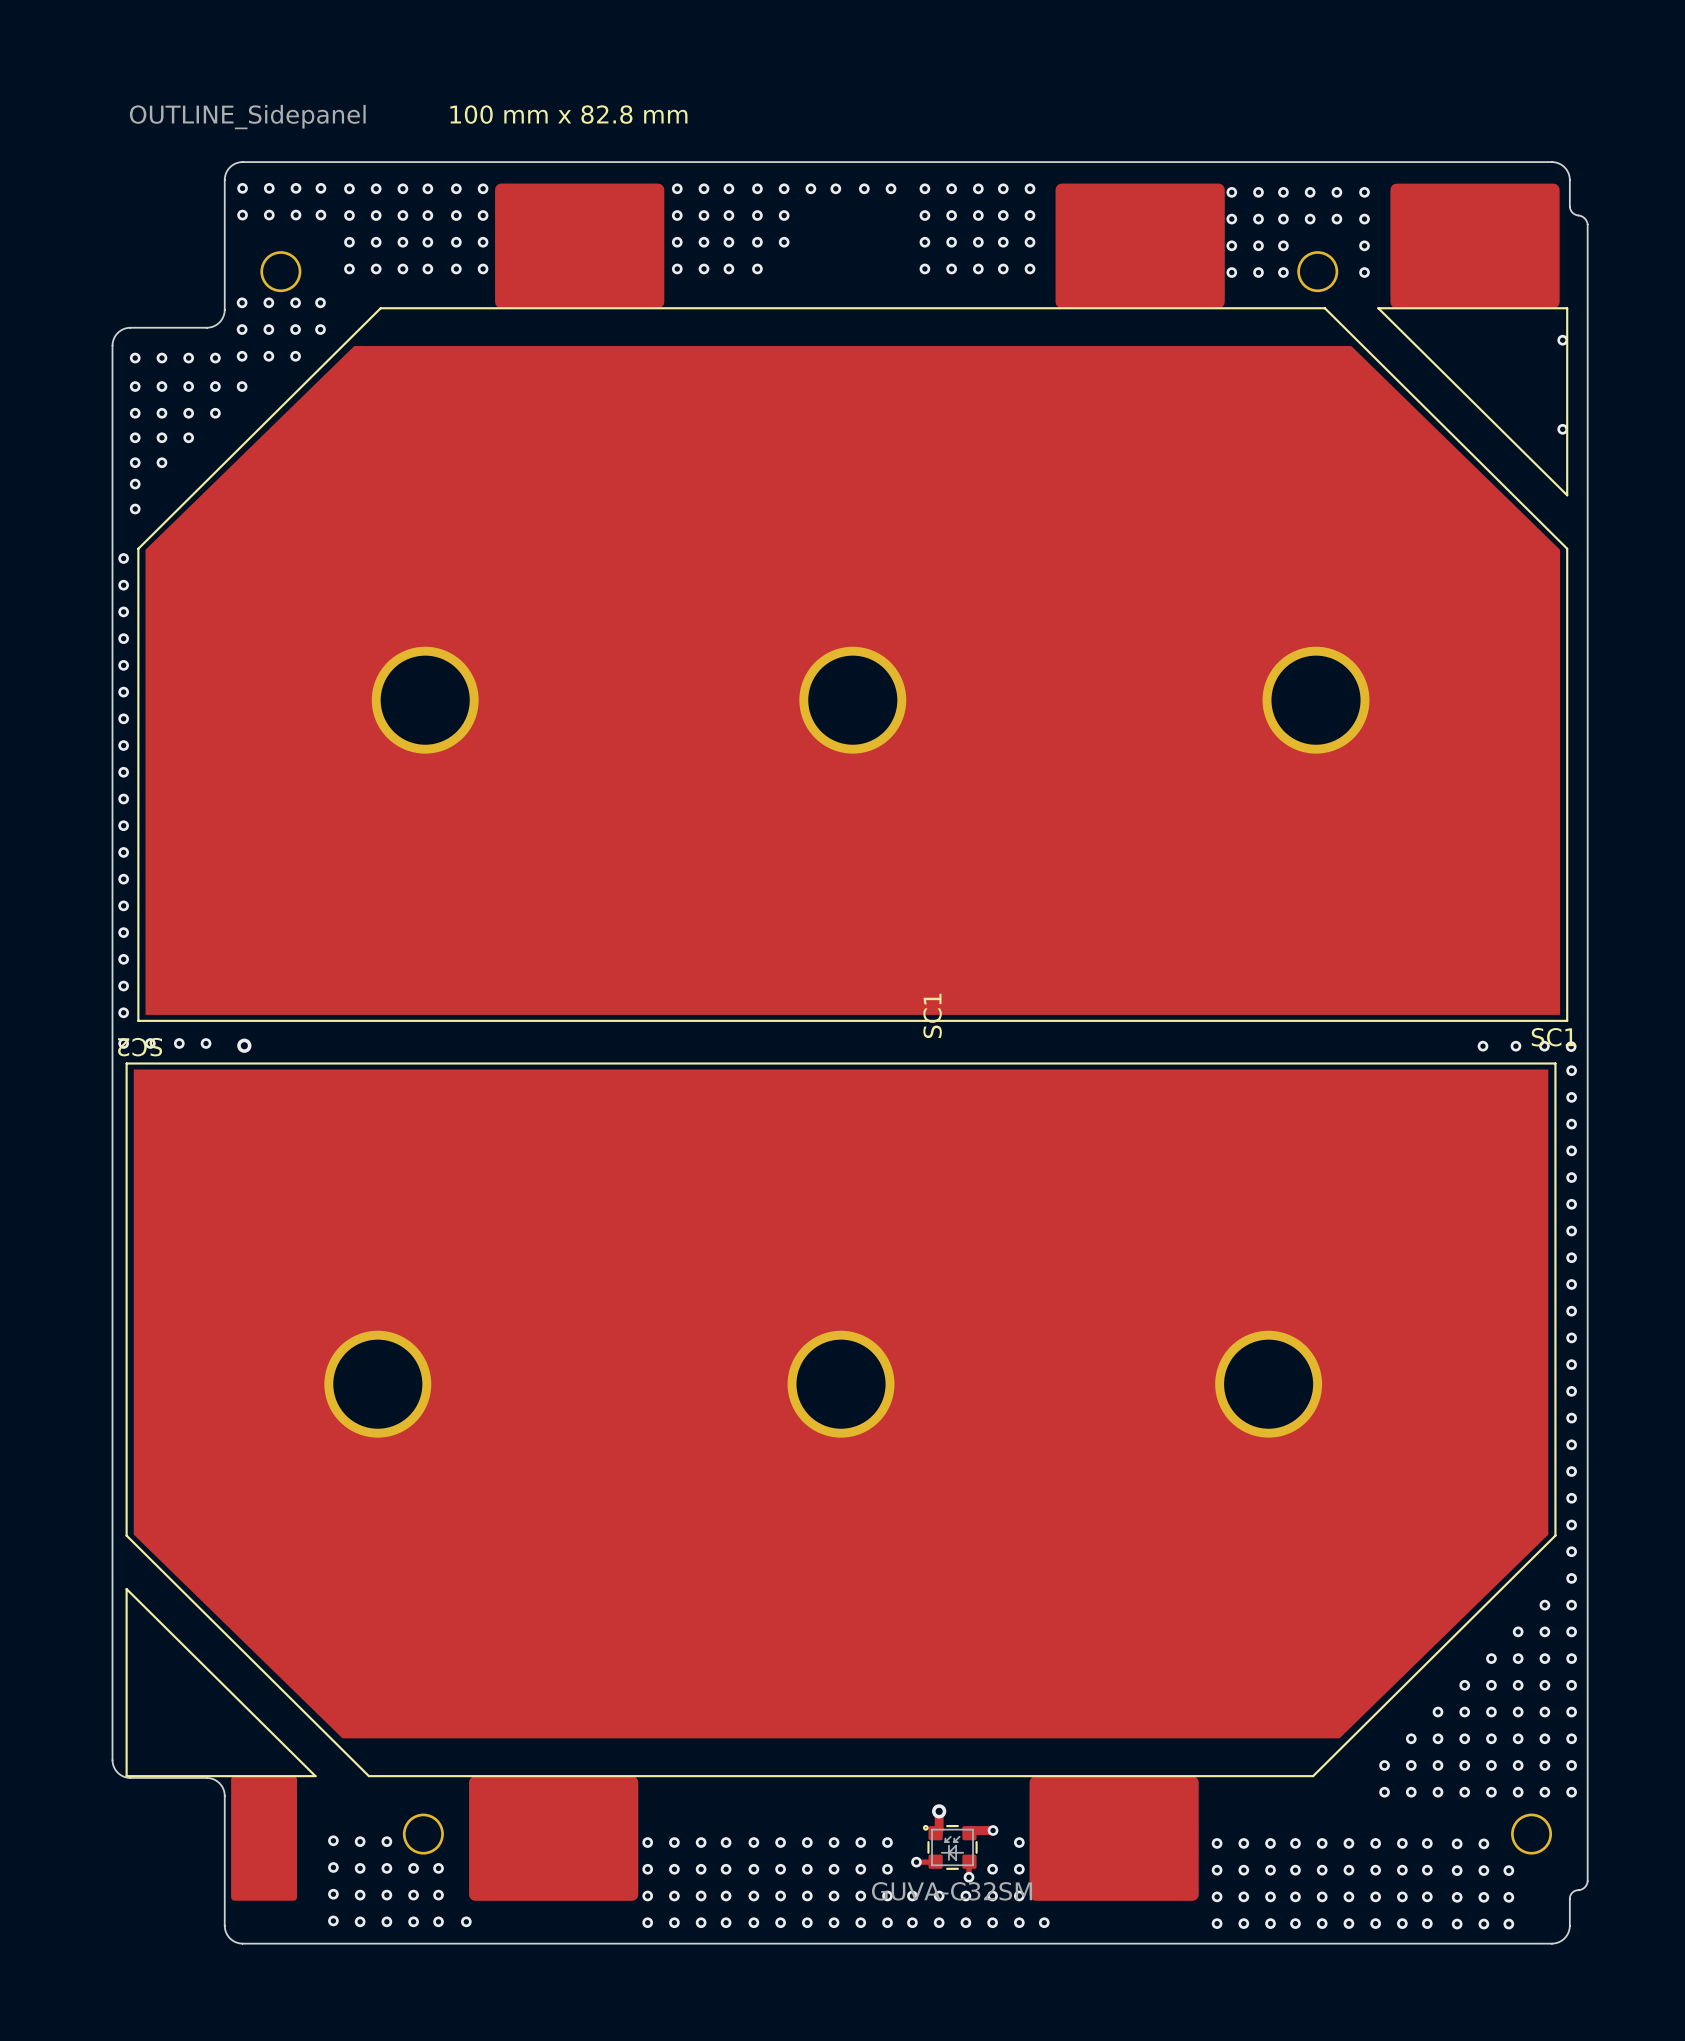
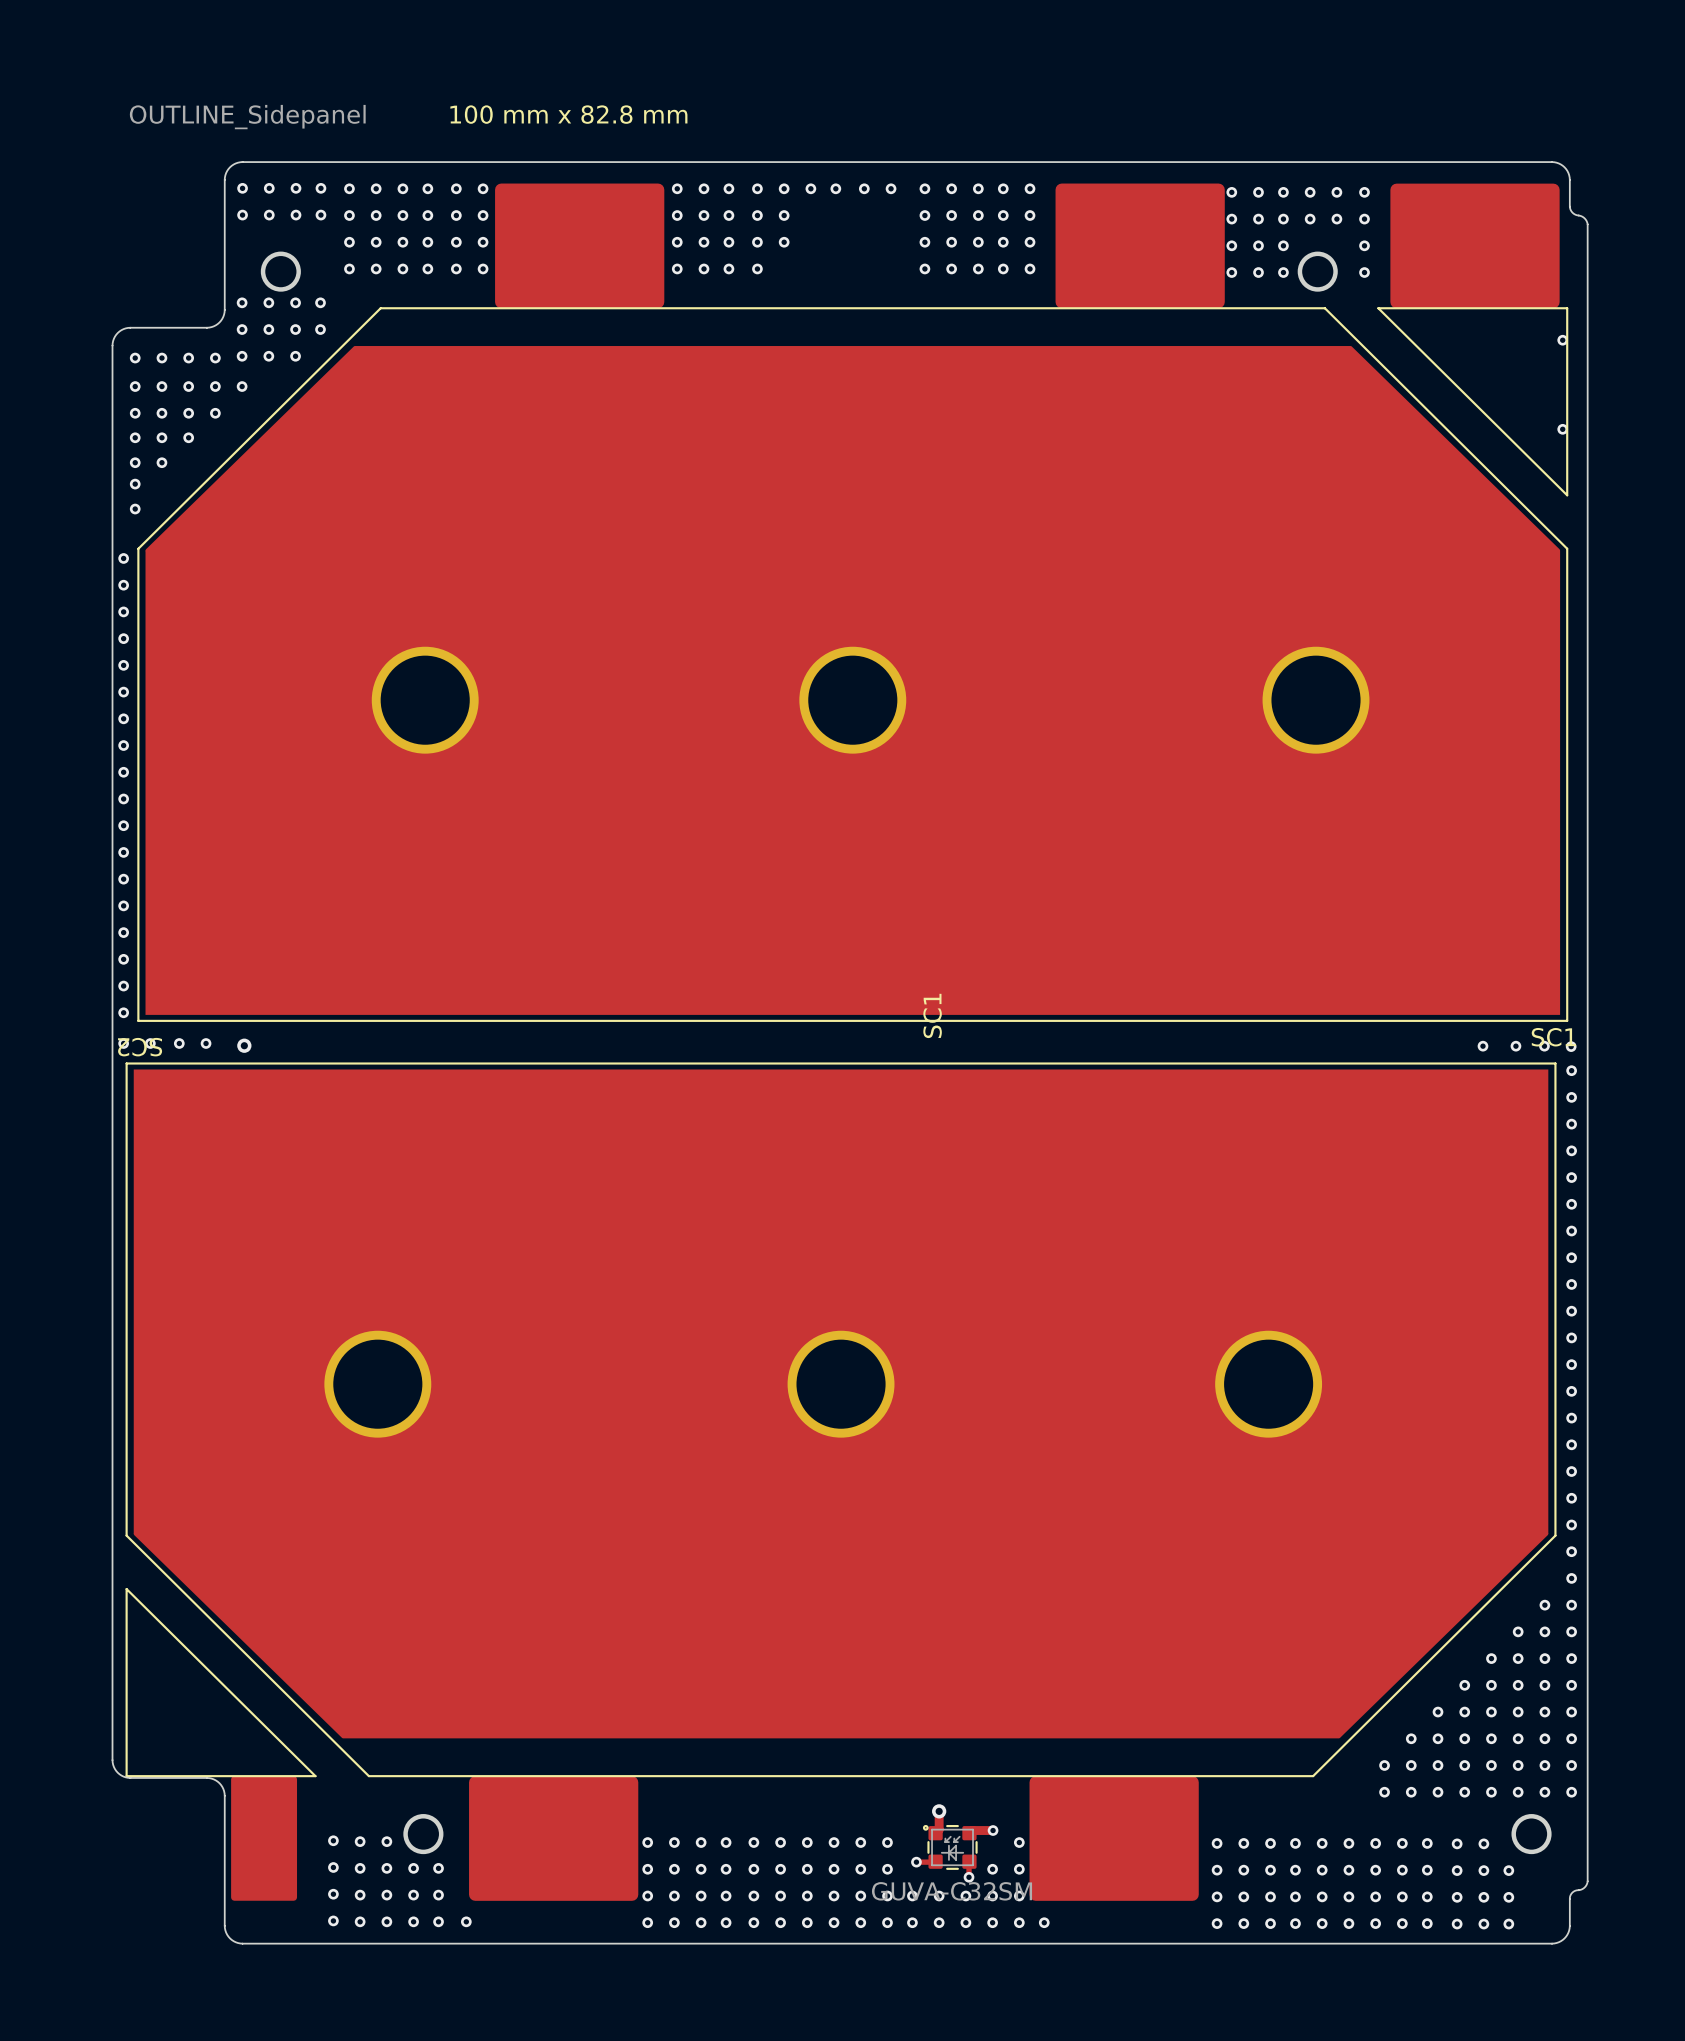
drawing: none -> [111, 161, 1589, 1945]
part: OUTLINE_Sidepanel (850, 1052) -> none

